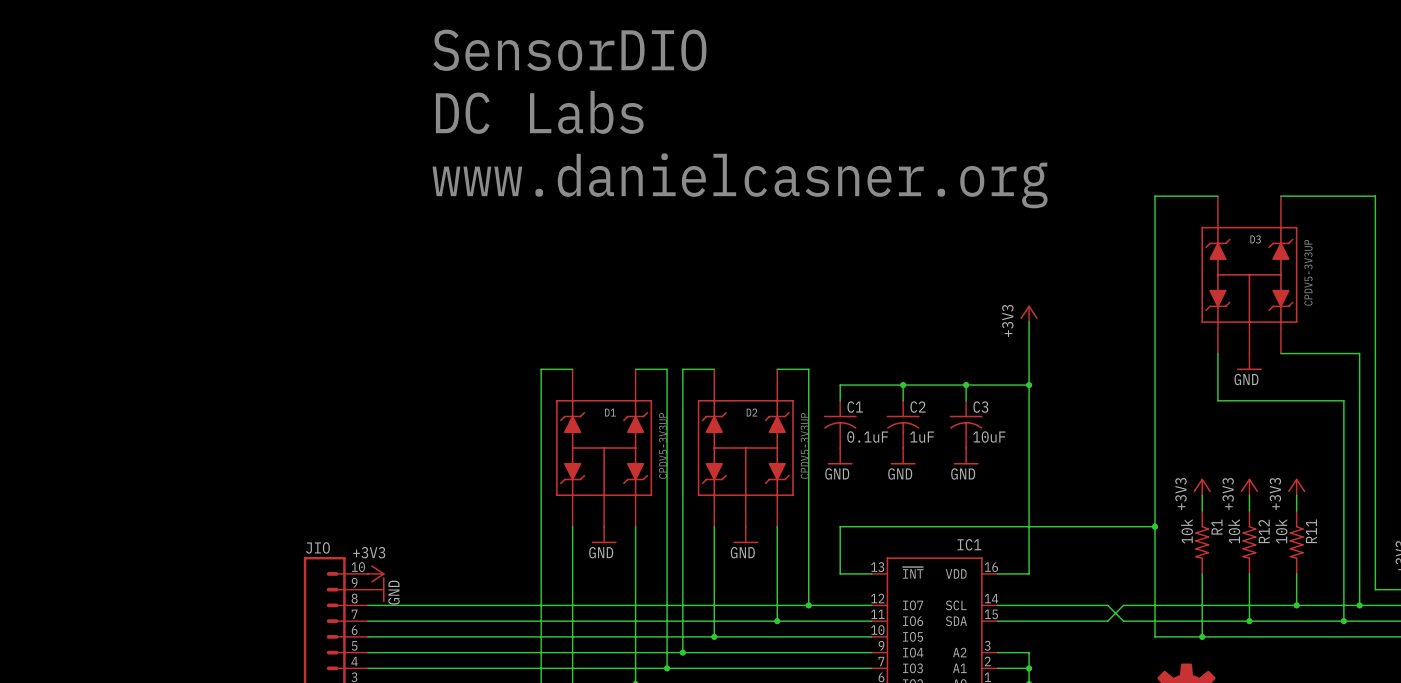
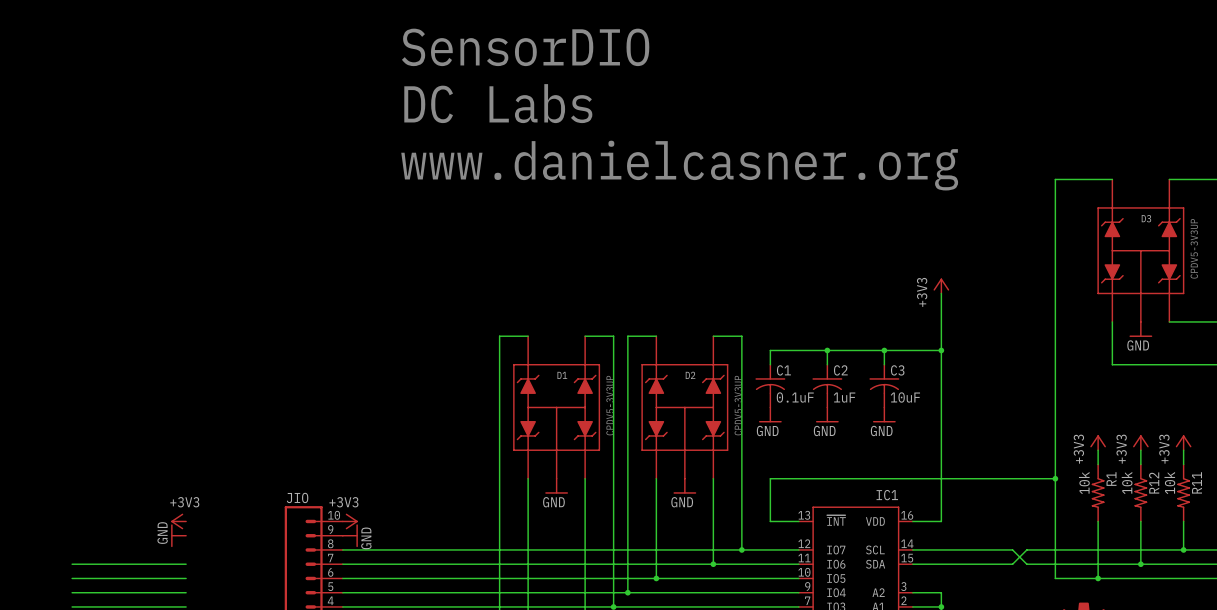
power symbol: none -> +3V3 (178, 521)
power symbol: none -> GND (178, 535)
wire: none -> (72, 564) (186, 564)
wire: none -> (72, 578) (186, 578)
wire: none -> (72, 592) (186, 592)
wire: none -> (72, 606) (186, 606)

